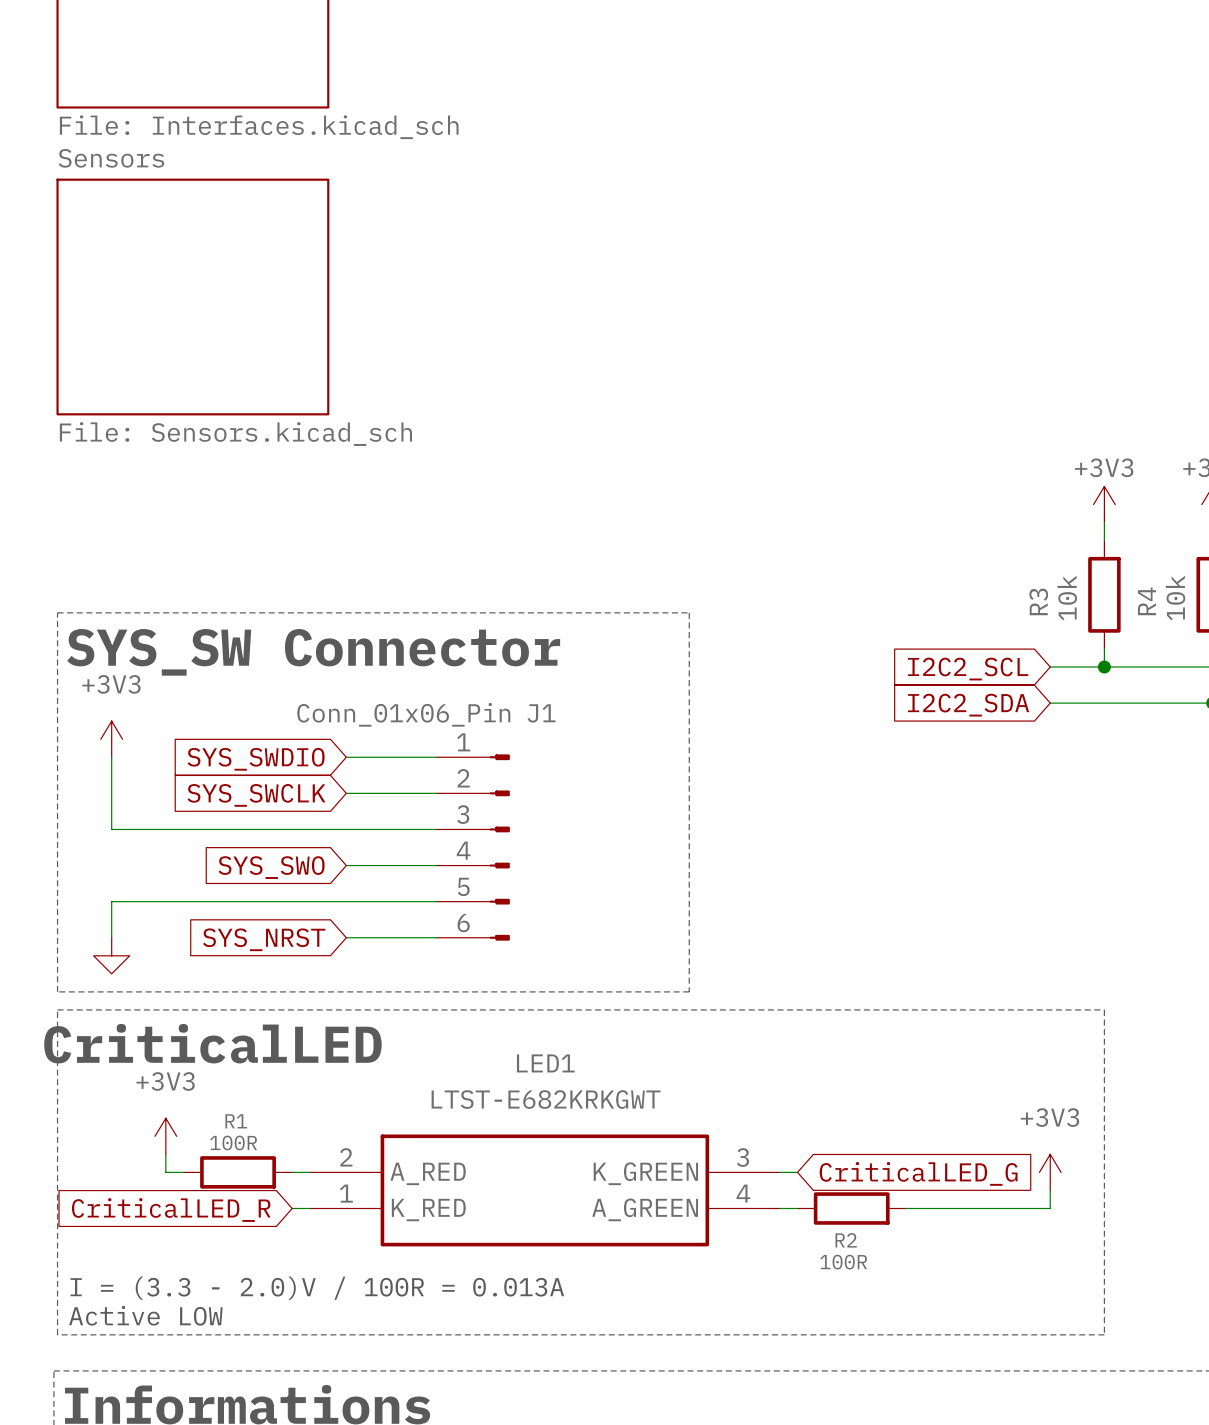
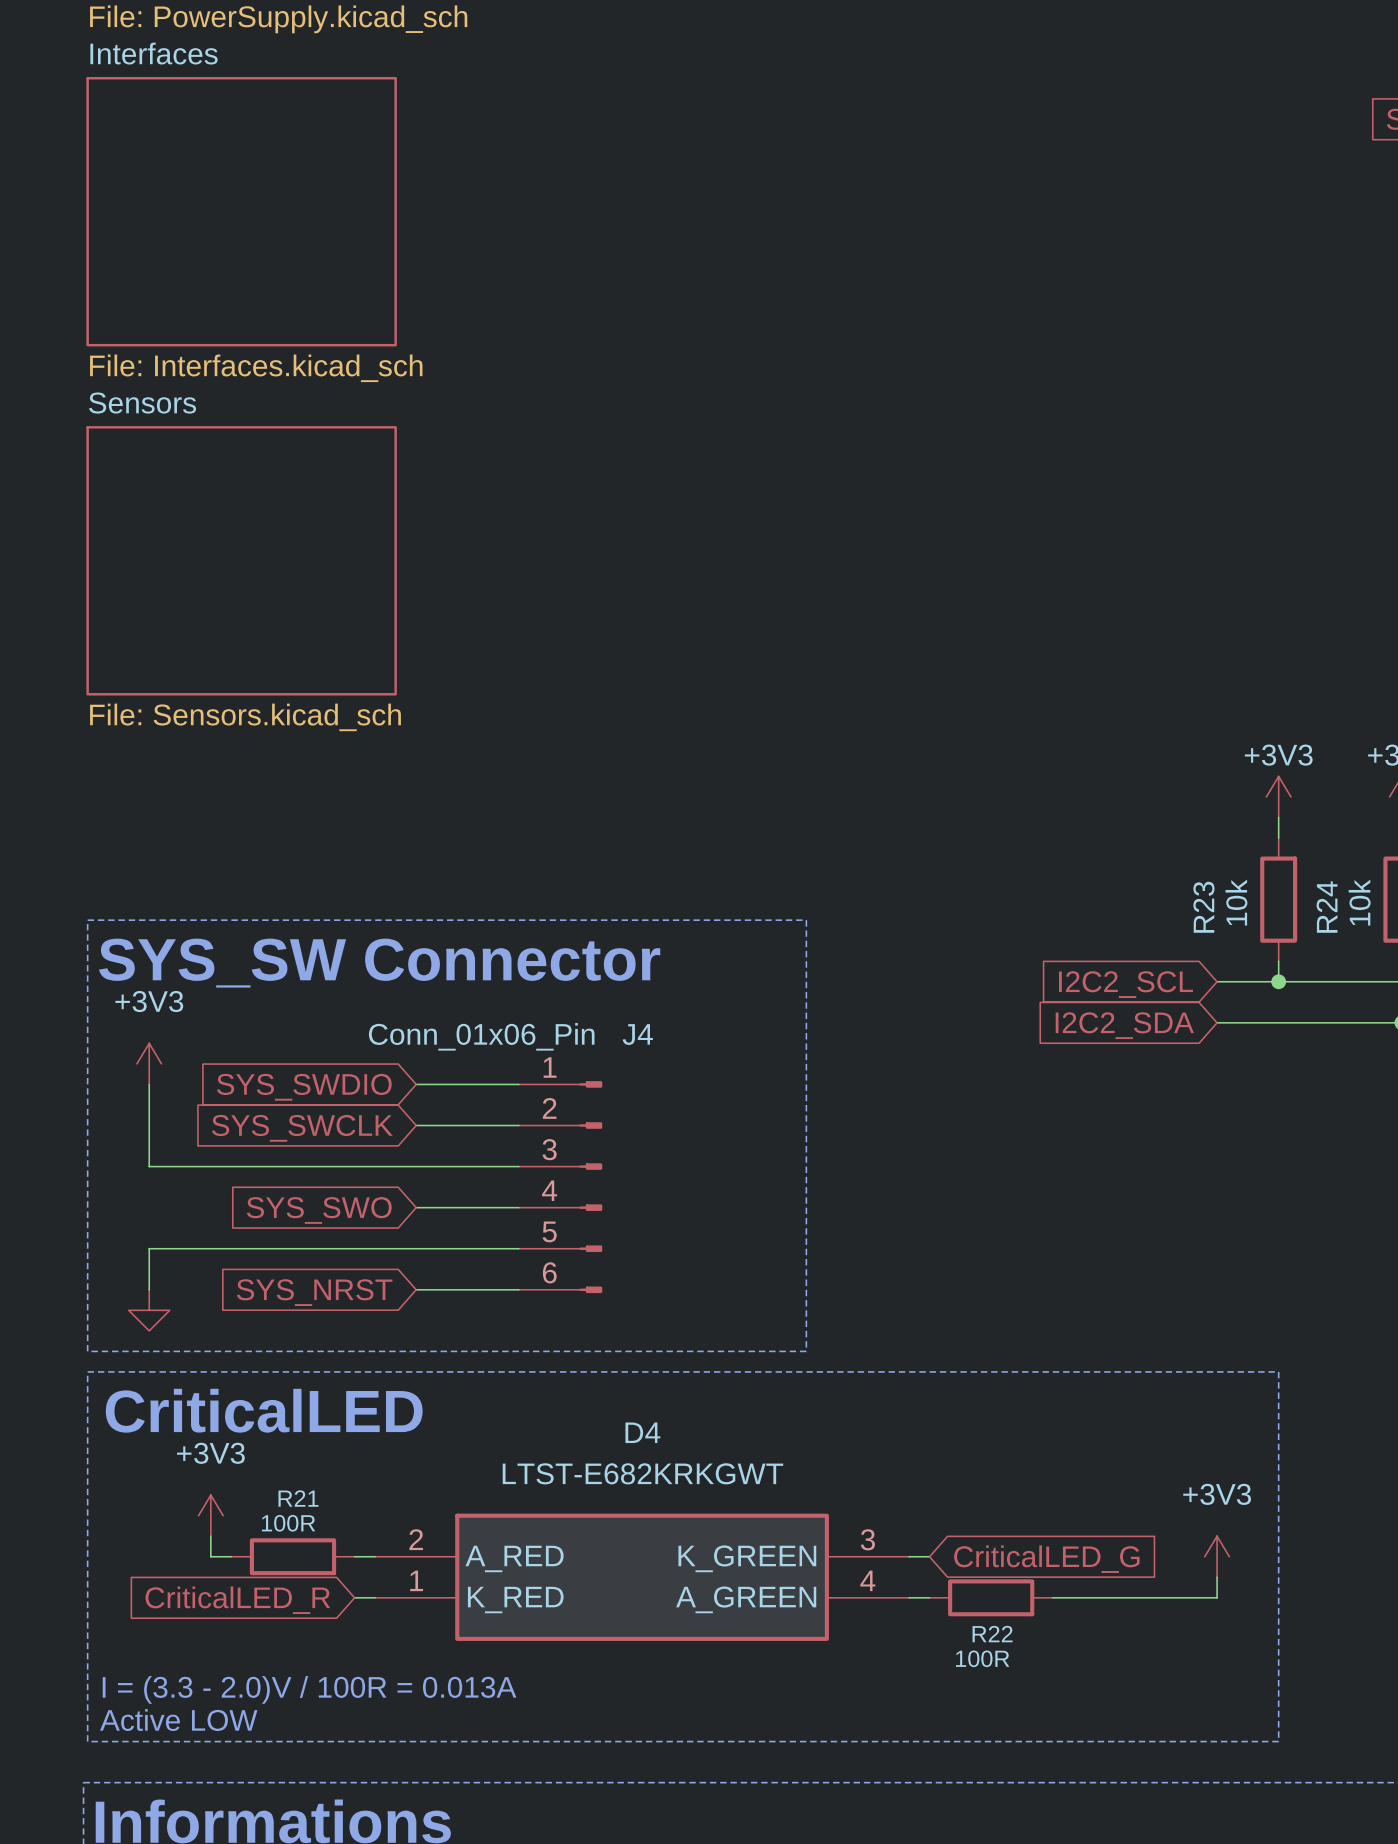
R3 name: R3 (1038, 601) -> R23 (1203, 907)
R4 name: R4 (1147, 601) -> R24 (1327, 907)
J1 name: J1 (541, 713) -> J4 (637, 1034)
LED1 name: LED1 (545, 1063) -> D4 (642, 1432)
R1 name: R1 (236, 1121) -> R21 (298, 1498)
R2 name: R2 (846, 1240) -> R22 (992, 1634)

